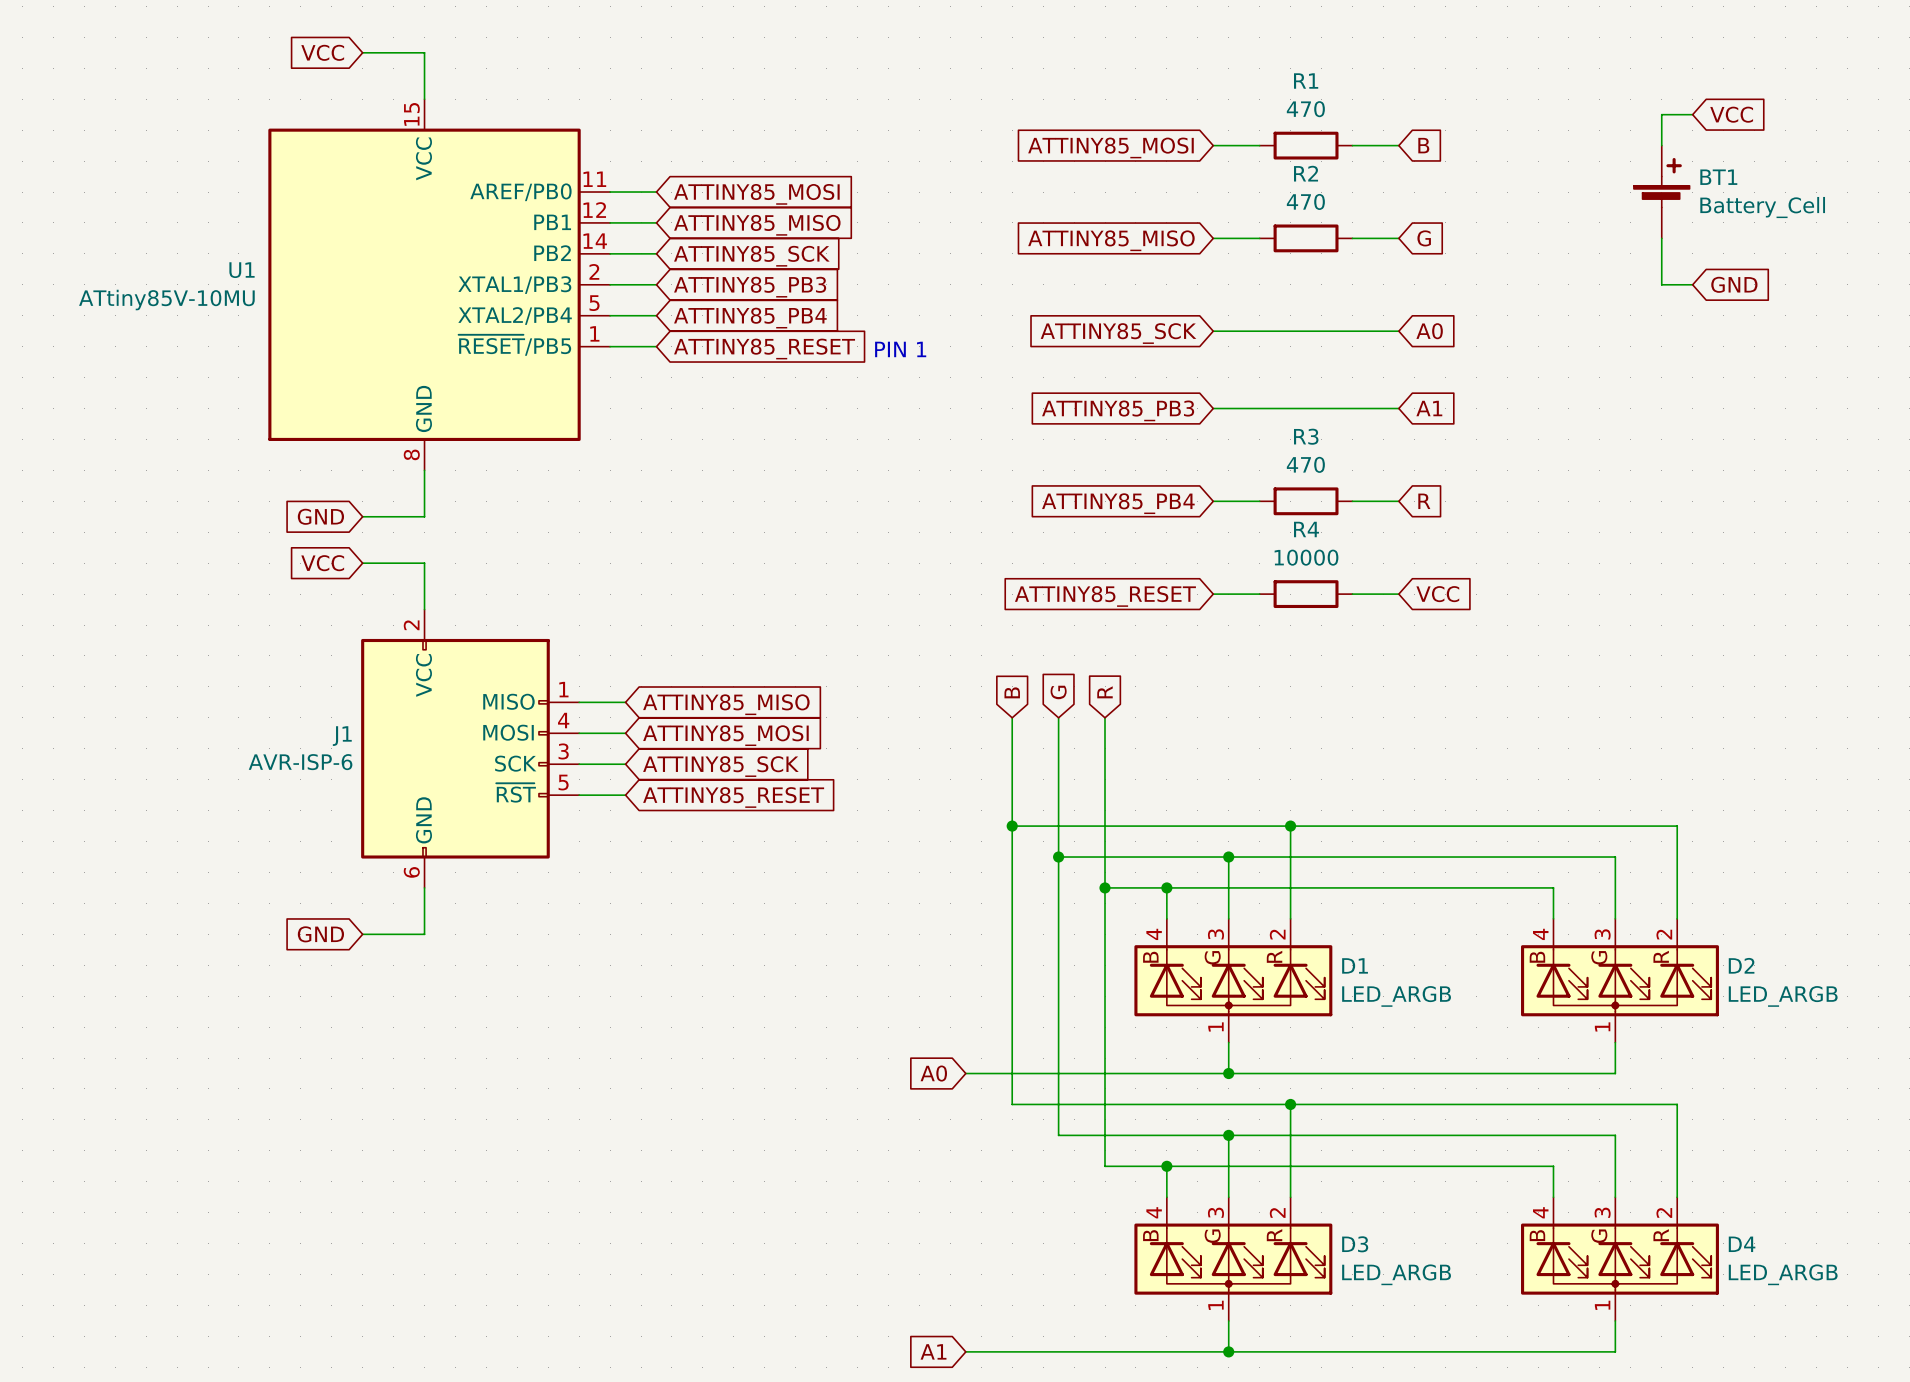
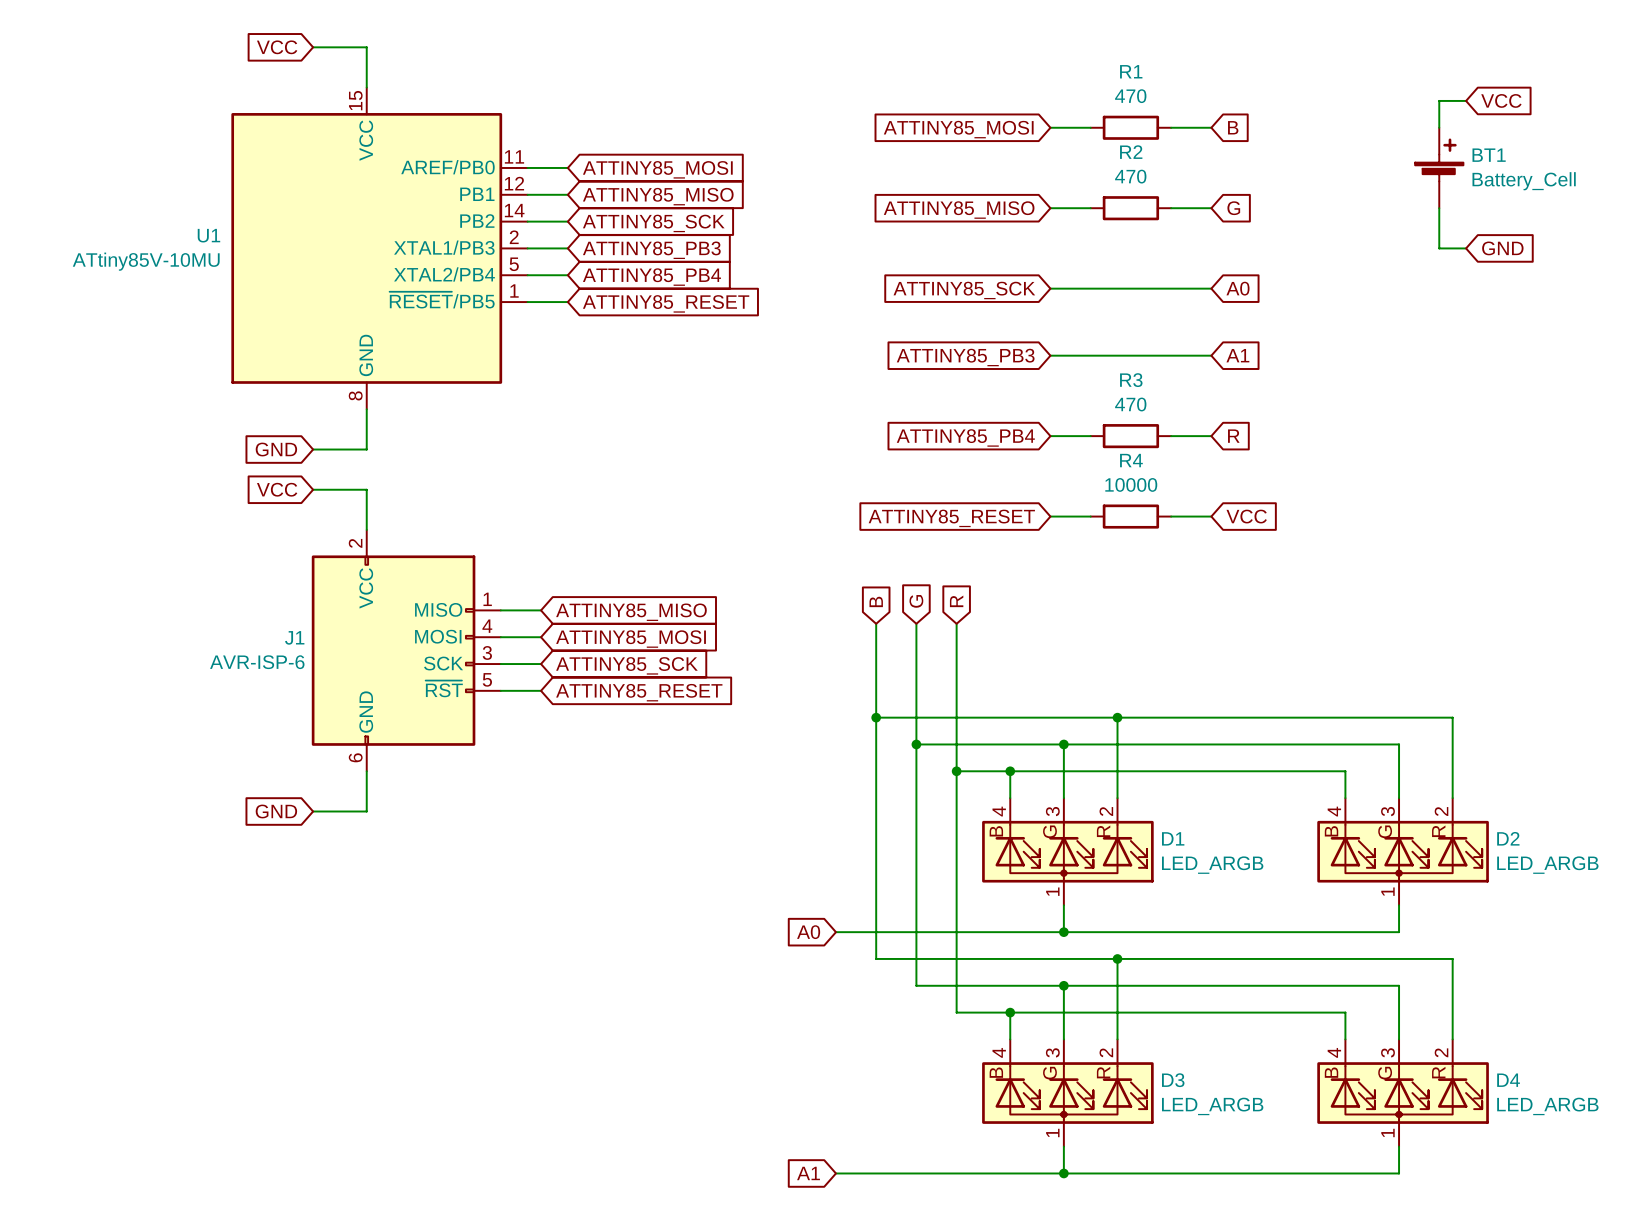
text: PIN 1 (900, 349) -> none

